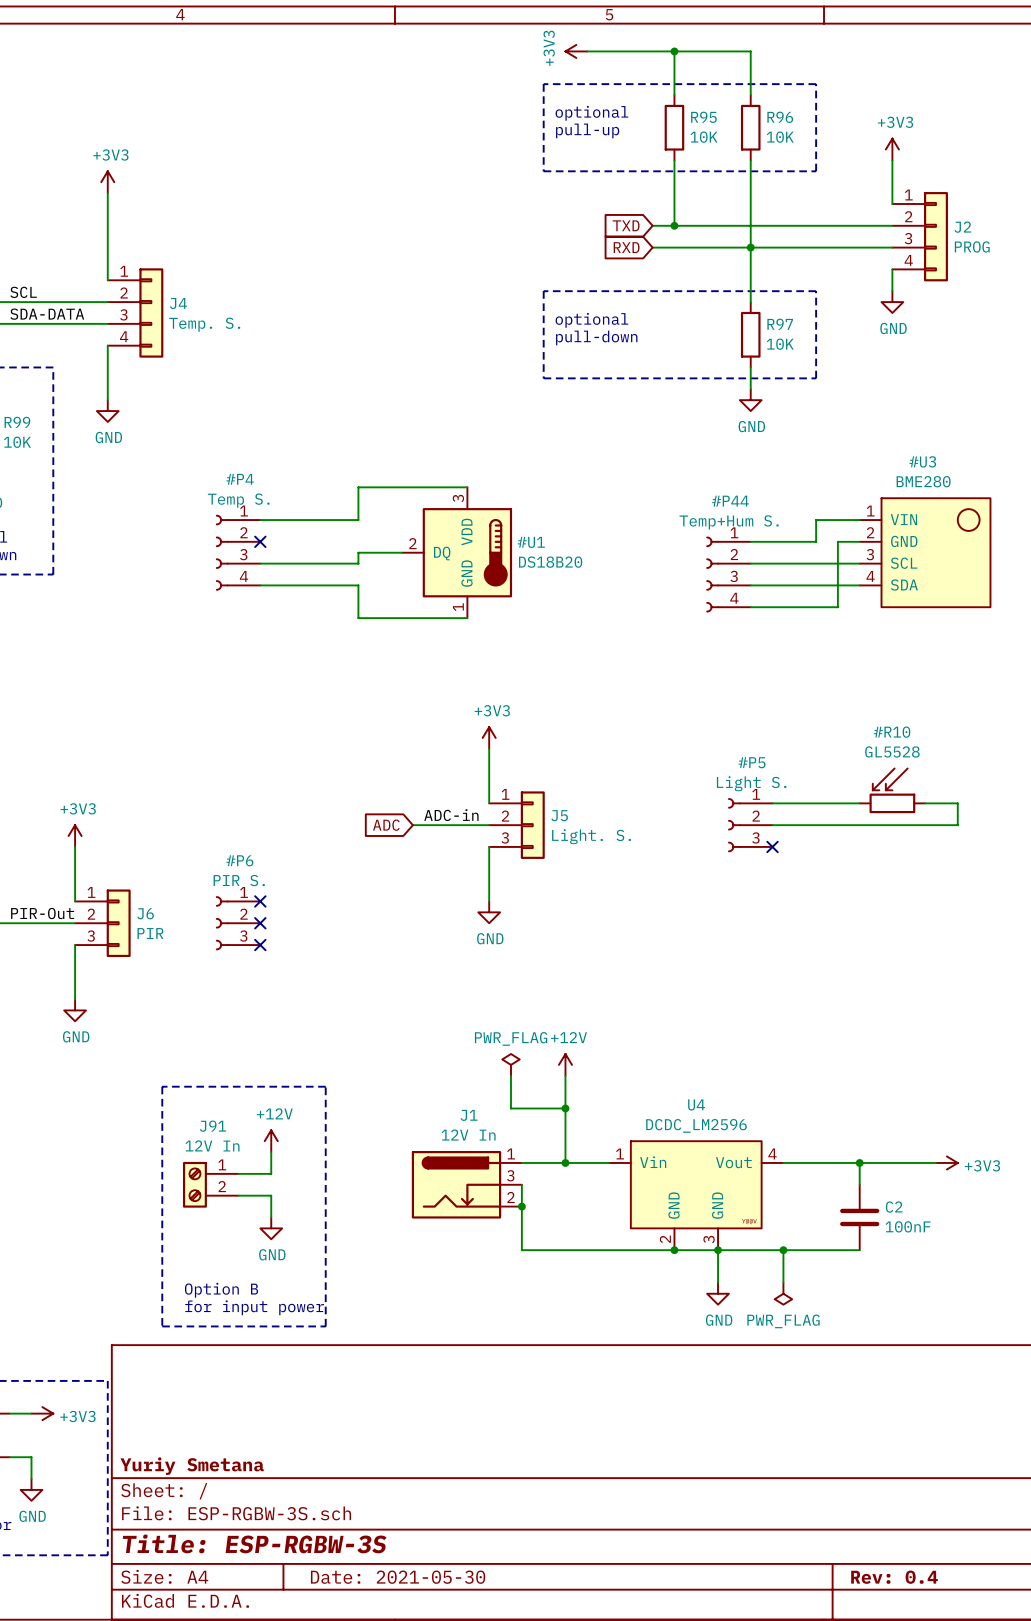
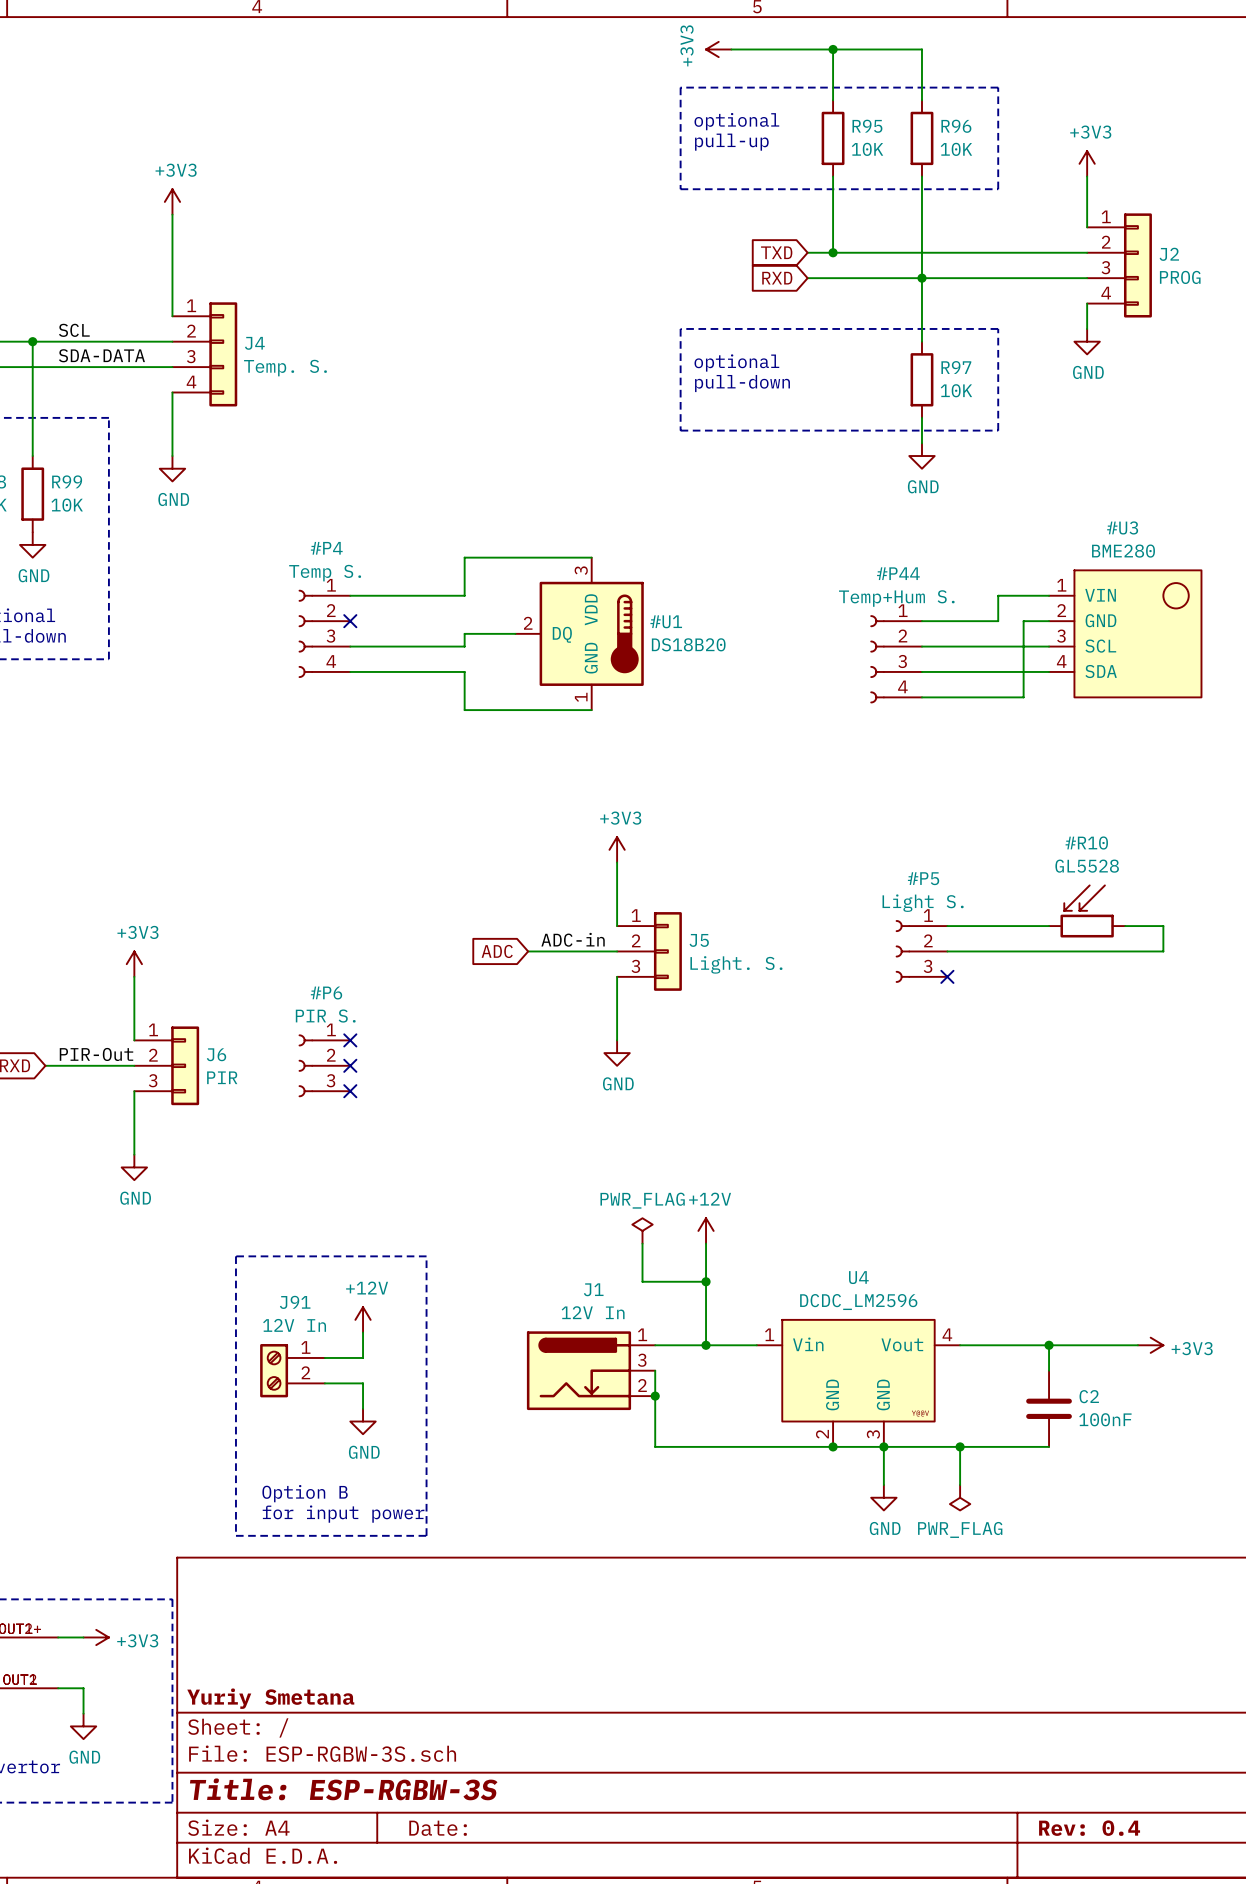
title block: Date: 2021-05-30 (398, 1577) -> Date: (438, 1828)

